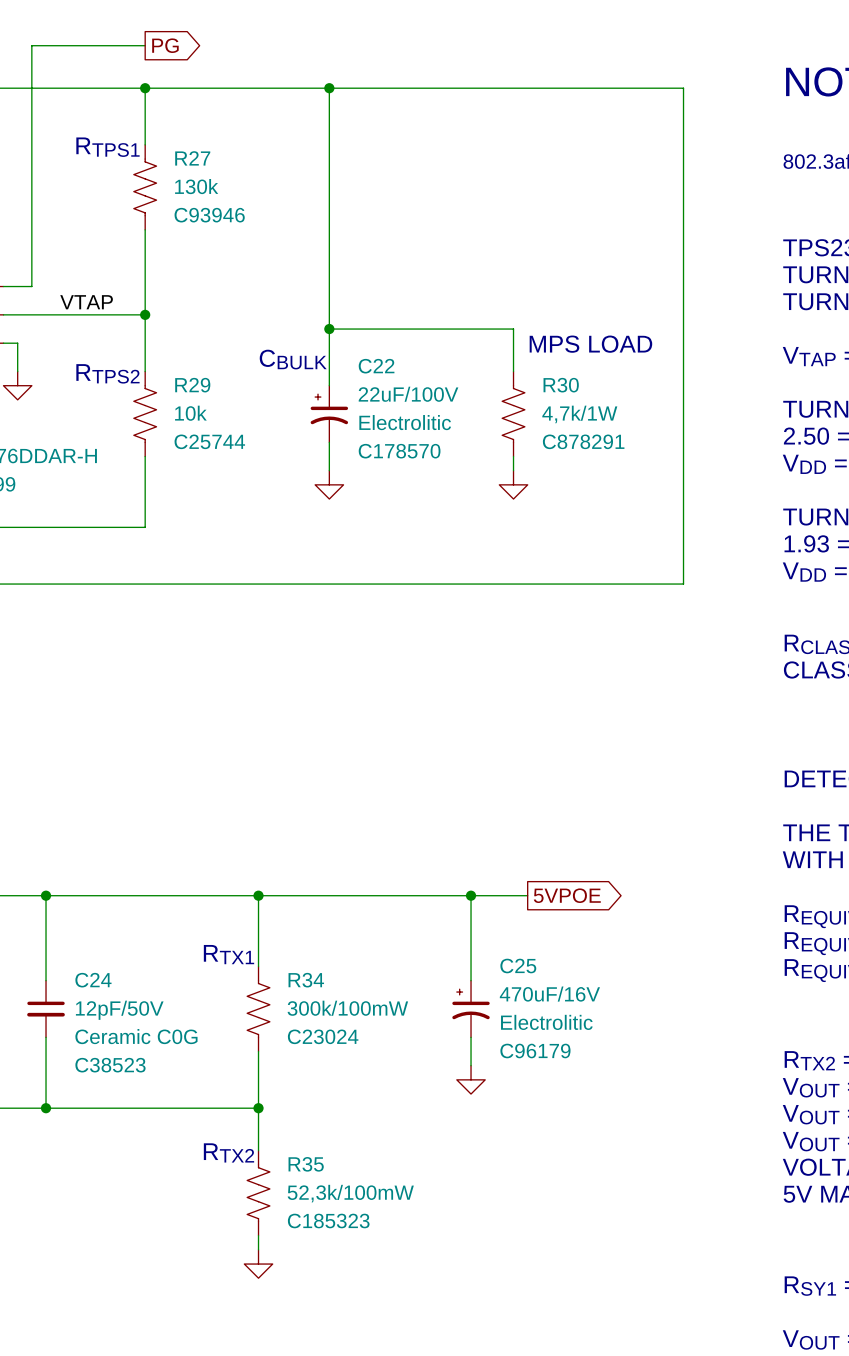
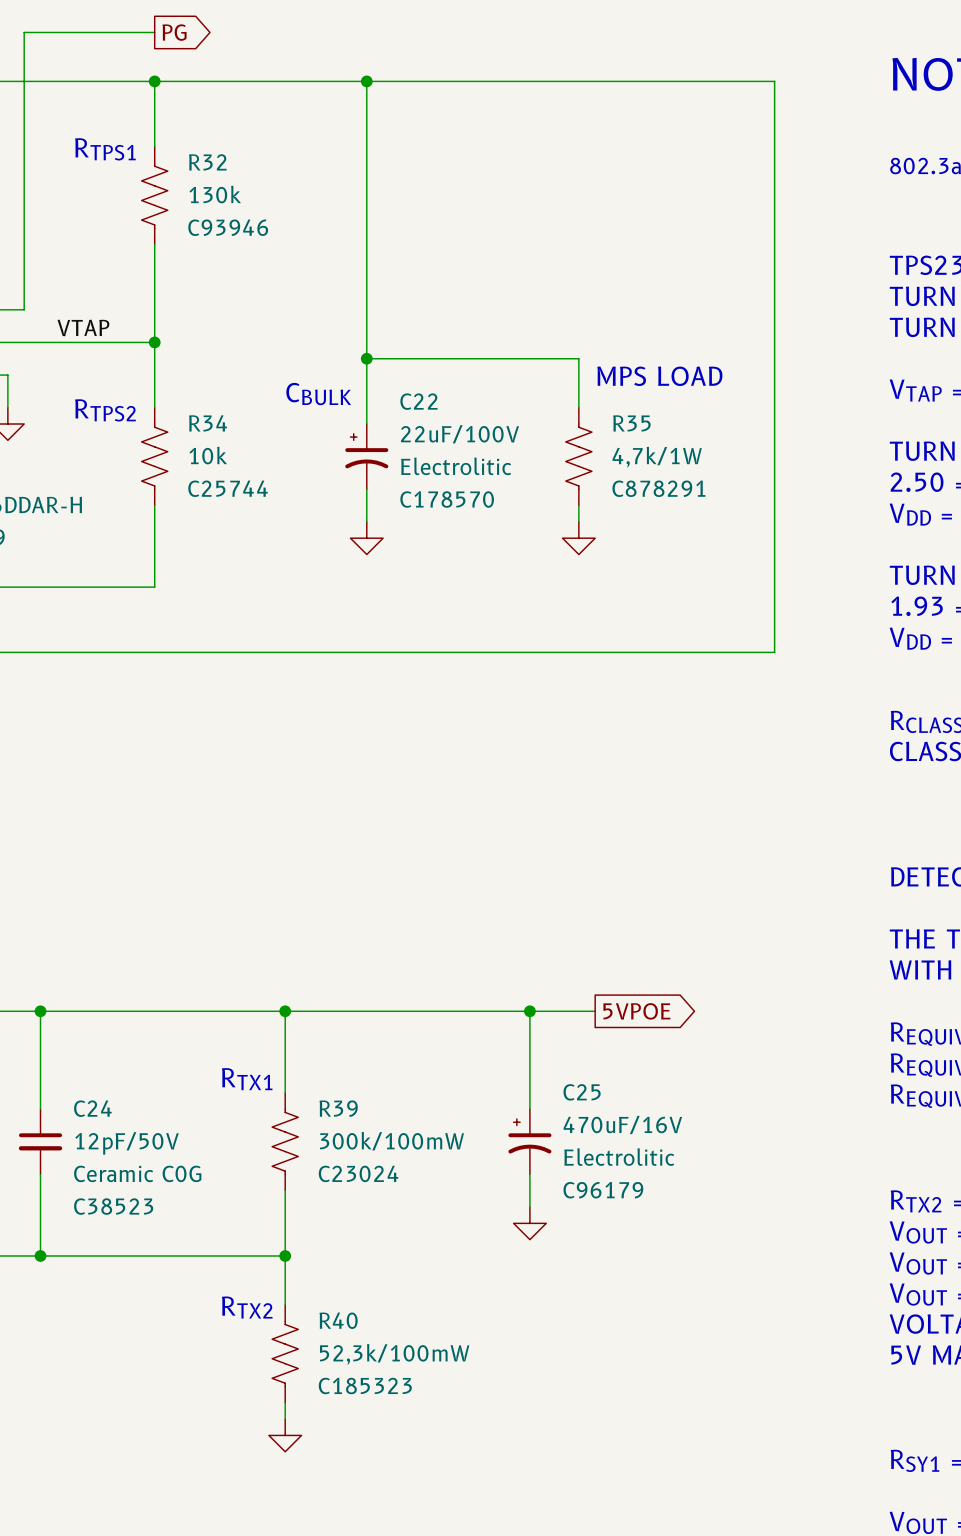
R27 name: R27 (192, 158) -> R32 (207, 162)
R29 name: R29 (192, 385) -> R34 (208, 423)
R30 name: R30 (561, 385) -> R35 (631, 423)
R34 name: R34 (306, 980) -> R39 (338, 1108)
R35 name: R35 (306, 1164) -> R40 (338, 1320)

